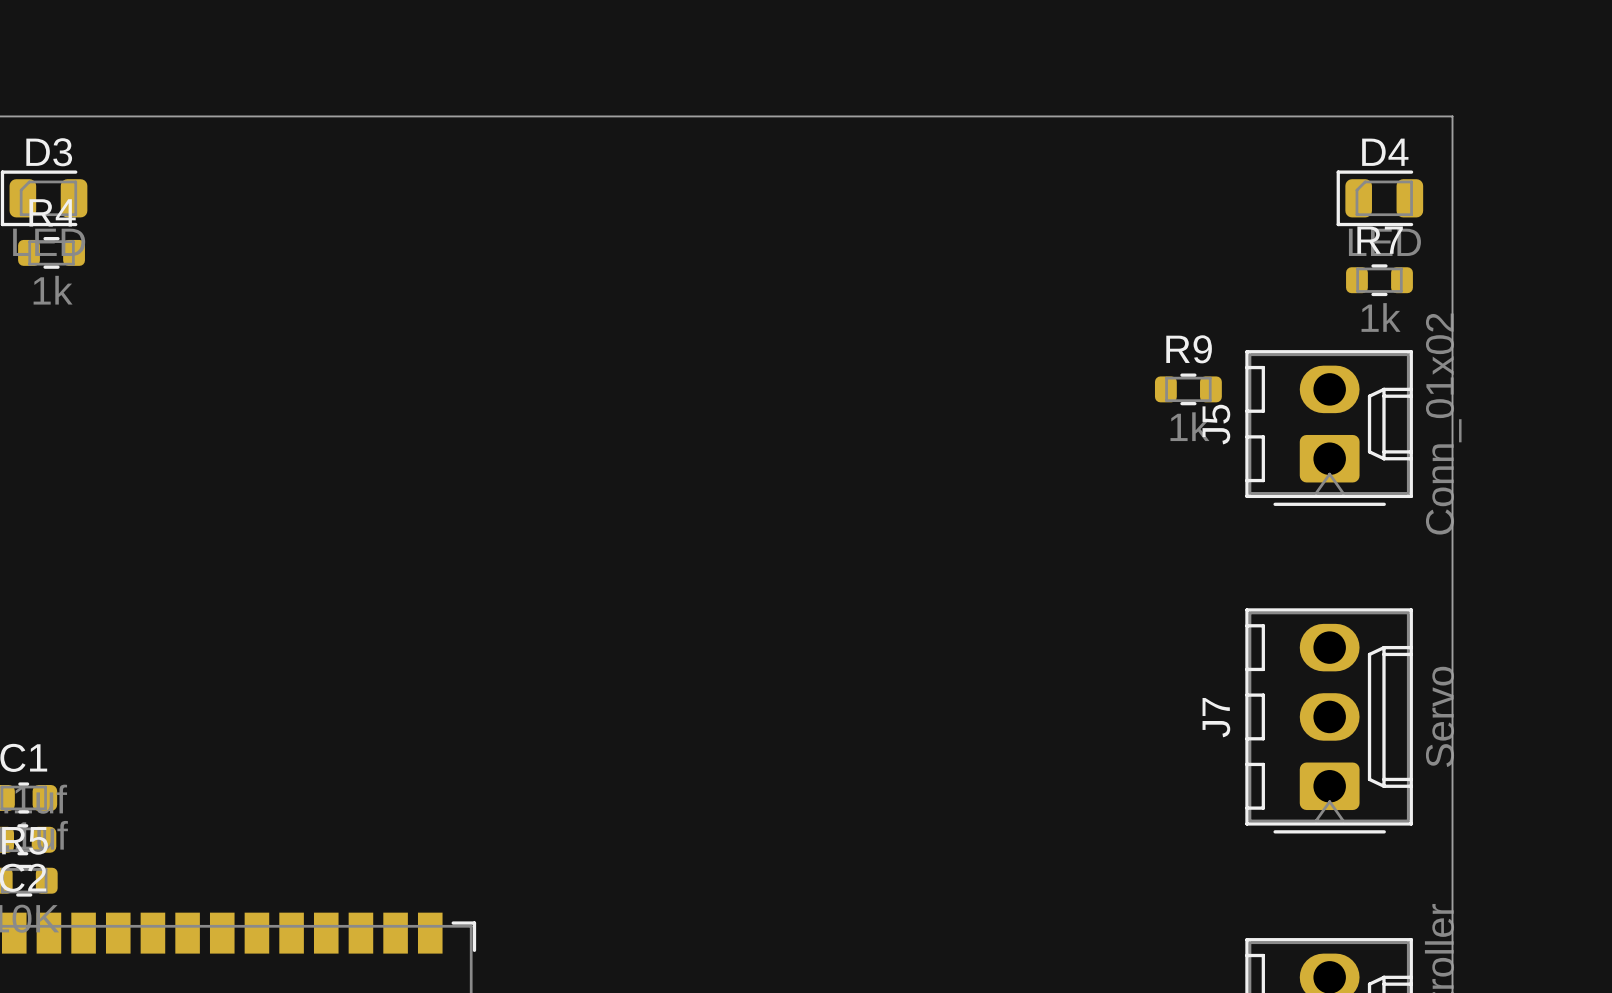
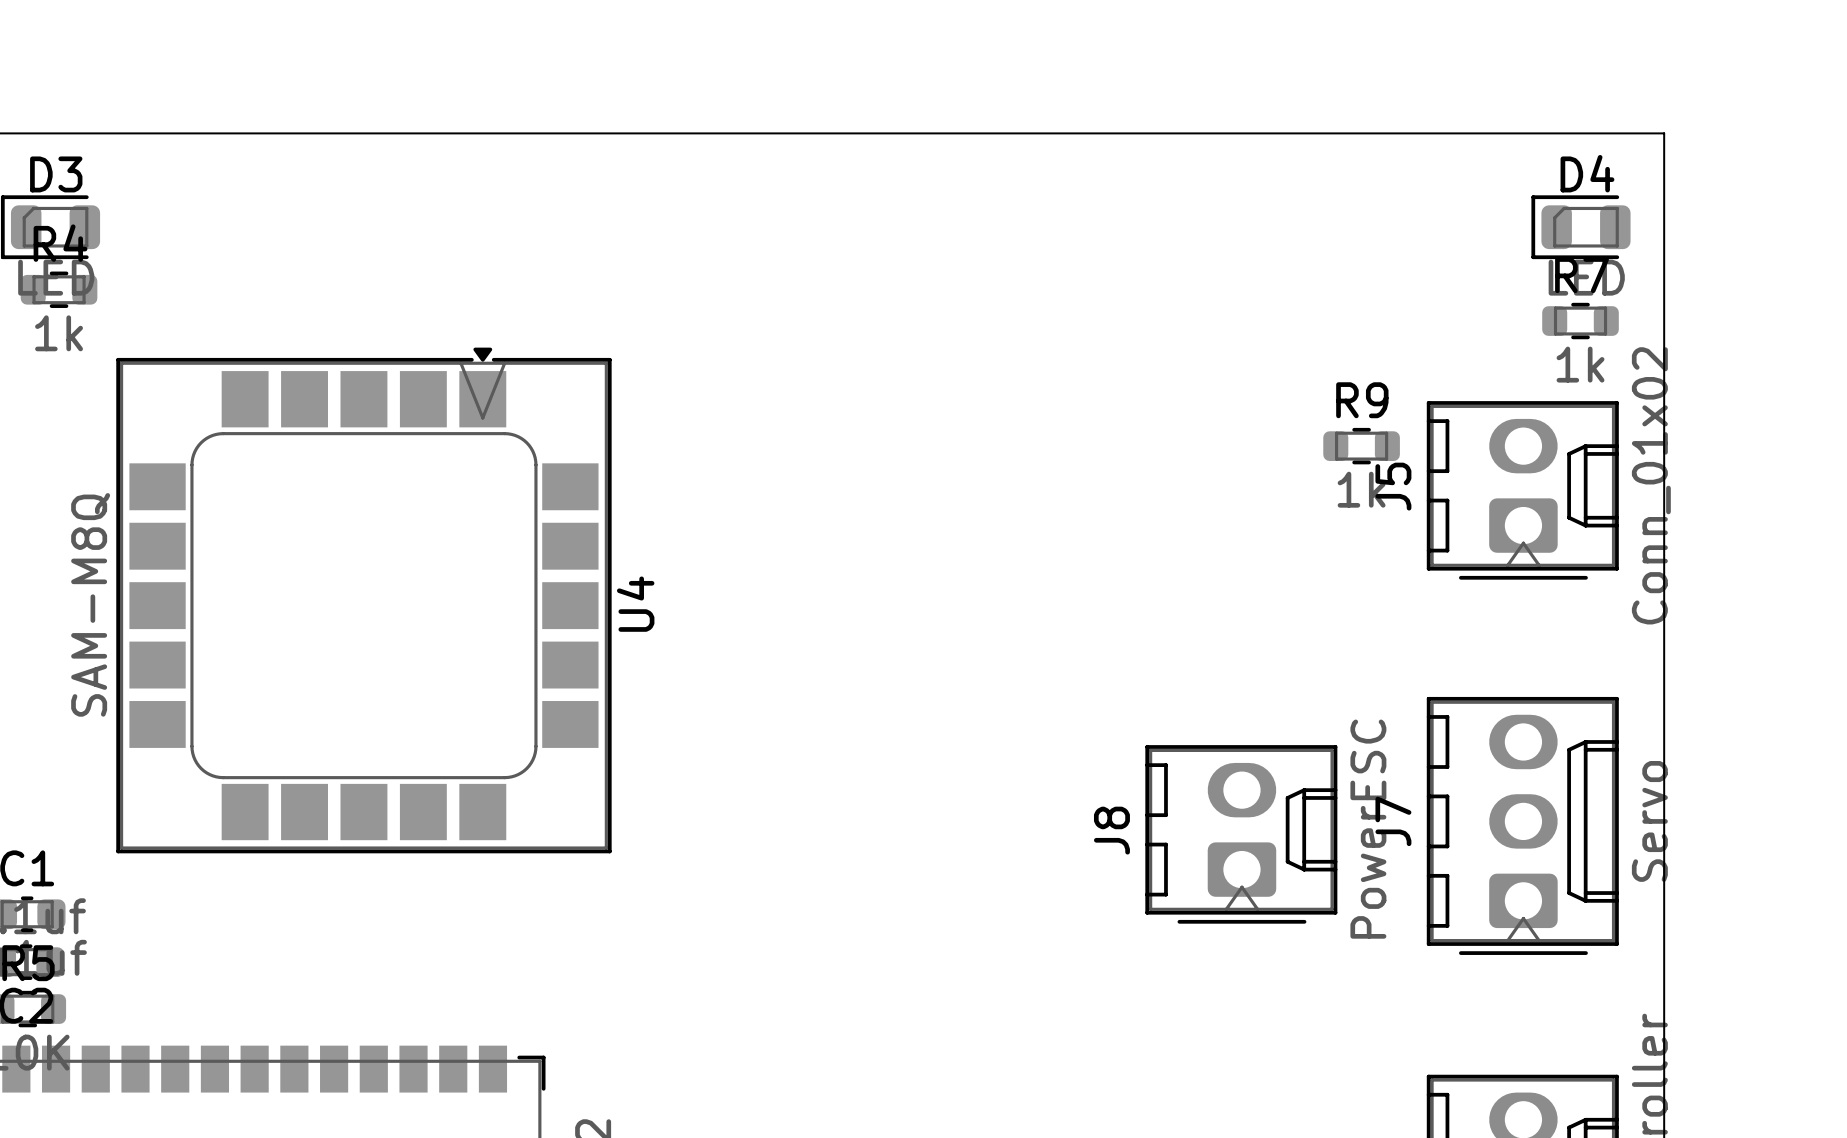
U4: none -> SAM-M8Q (363, 600)
J8: none -> PowerESC (1241, 834)

